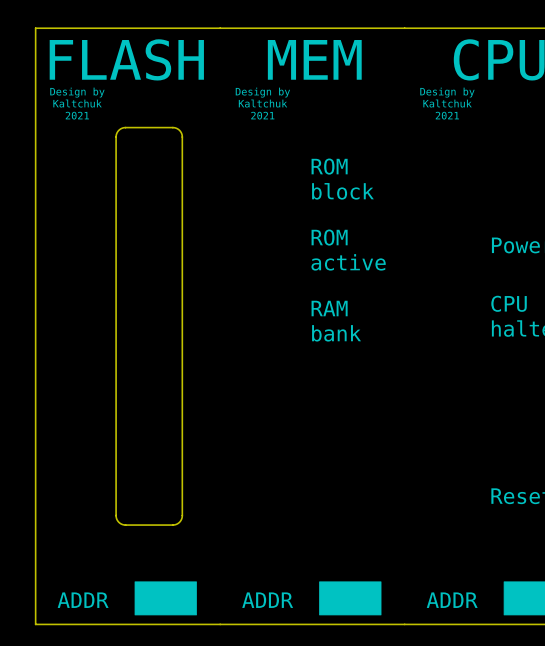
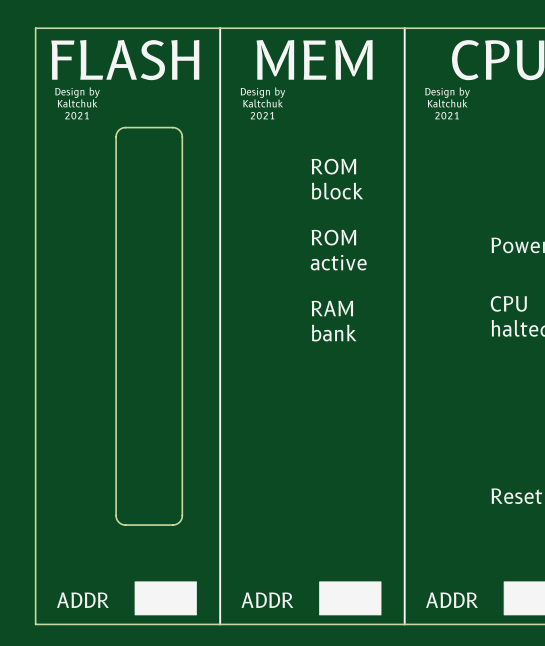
line: none -> (220, 28) (220, 624)
line: none -> (404, 28) (404, 624)

